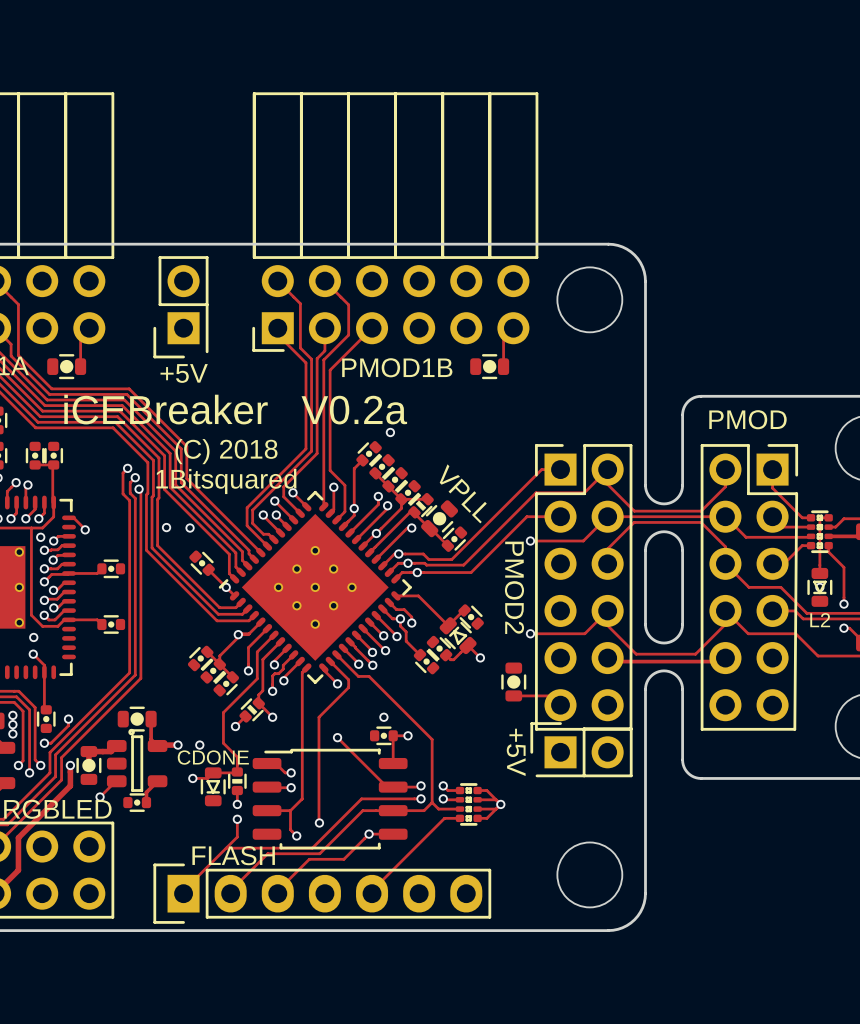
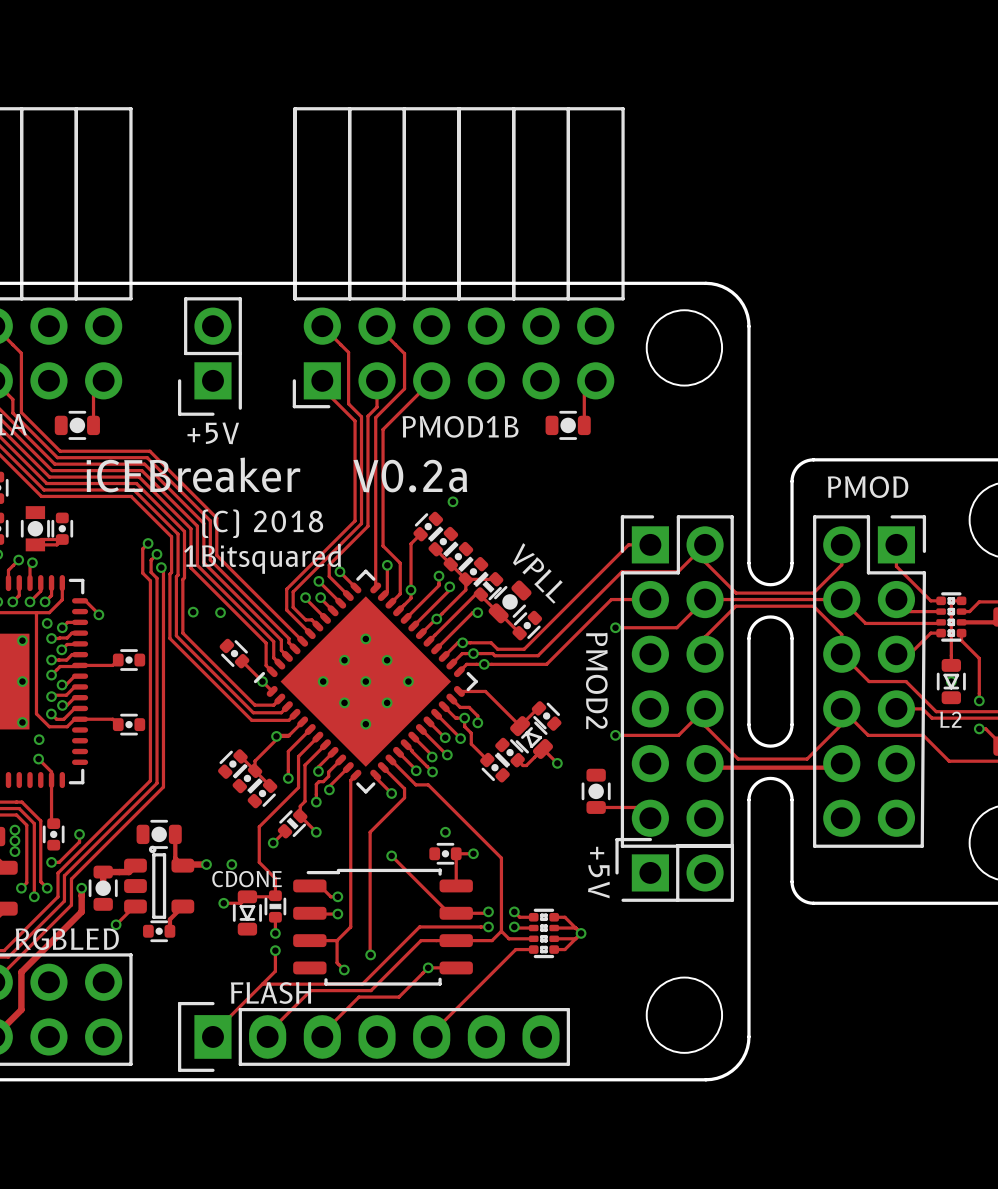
part footprint: [25, 441, 45, 470] -> [20, 506, 50, 552]
track: (52, 465) (52, 502) -> (61, 540) (56, 544) (35, 544)

